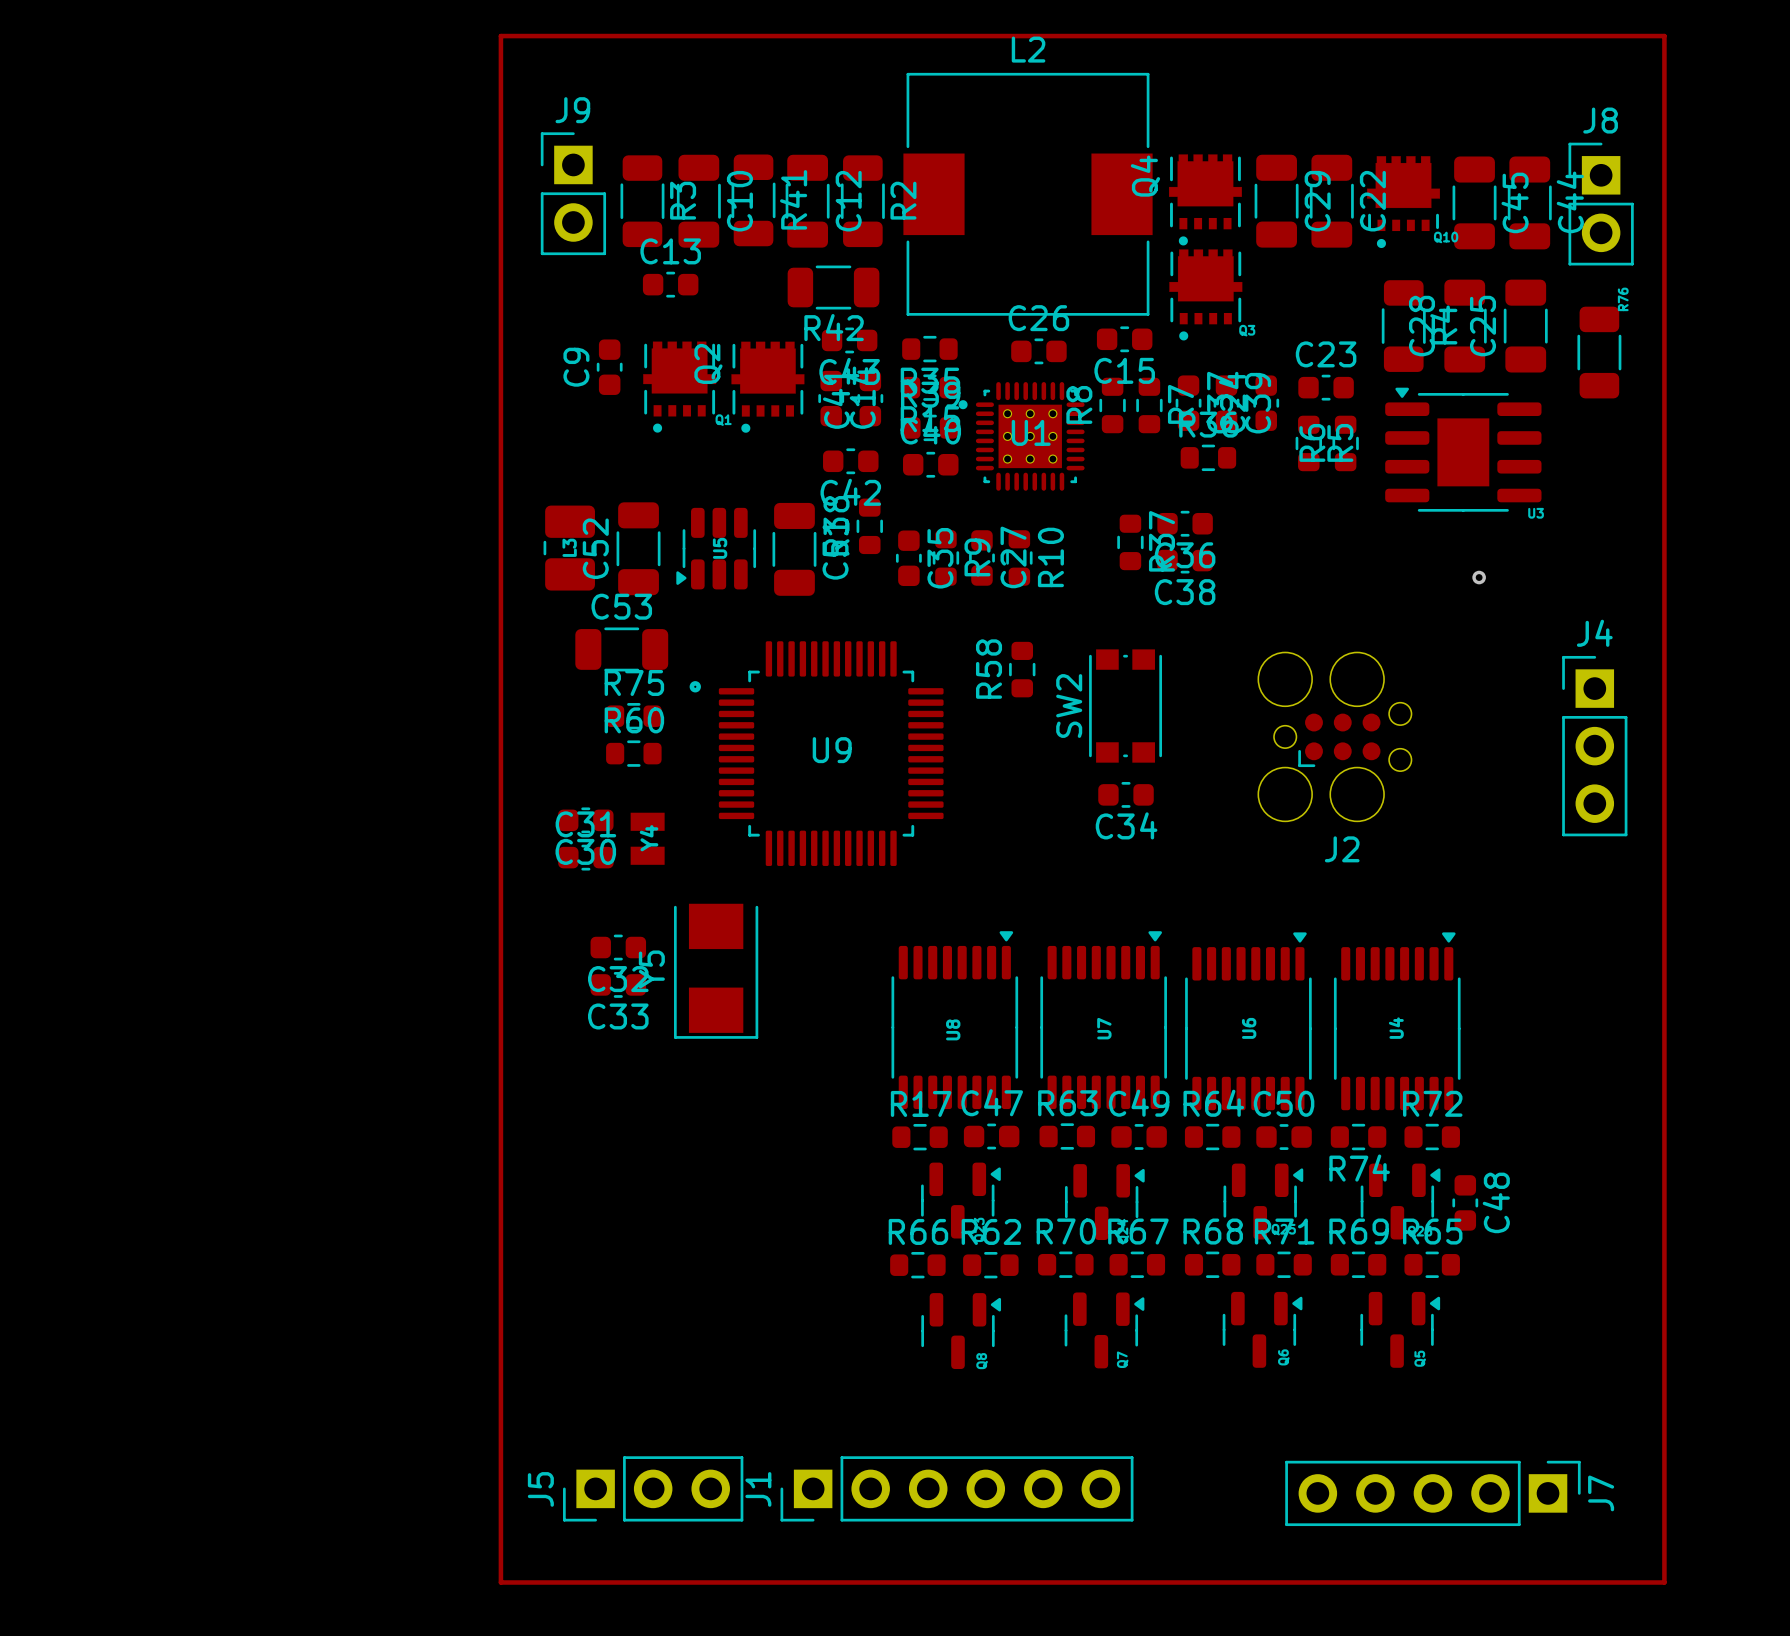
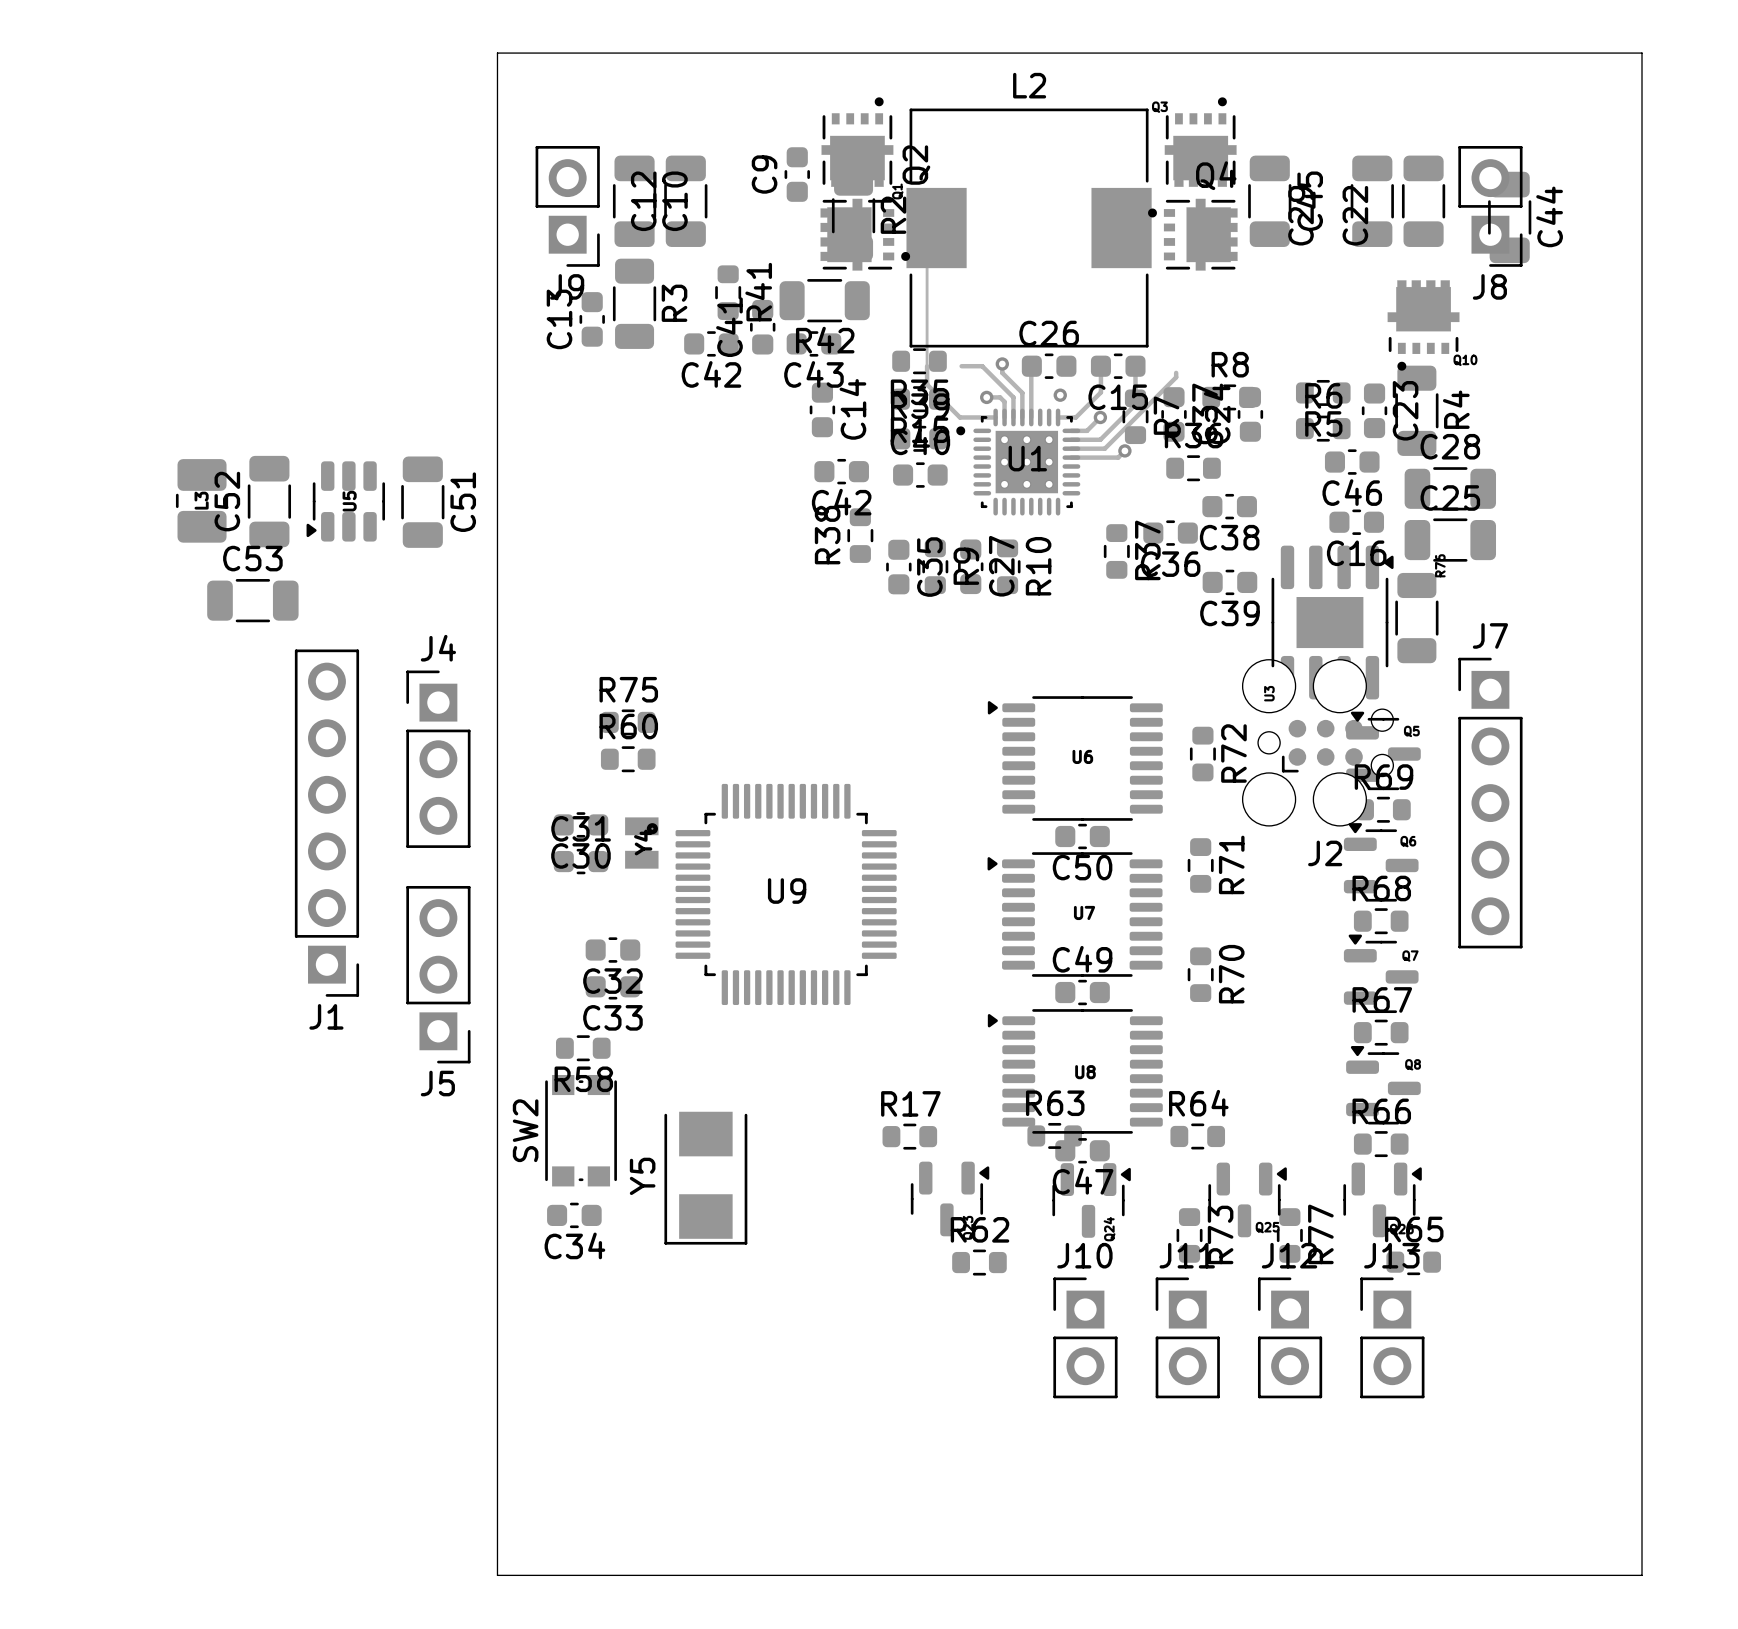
board edge: none -> (497, 53) (1642, 53) (1642, 1575) (497, 1575) (497, 53)
track: (500, 36) (1664, 36) (1664, 1582) (500, 1582) (500, 36) -> none
R41 footprint: [731, 154, 776, 247] -> [715, 265, 742, 320]
J9 rotation: 0° (573, 193) -> 180° (567, 206)
L2 position: (1028, 194) -> (1029, 228)
Q4 rotation: 0° (1205, 199) -> 90° clockwise (1192, 234)
R3 position: (642, 201) -> (634, 303)
C10 position: (698, 201) -> (634, 201)
C12 position: (807, 201) -> (685, 201)
C12 name position: C12 (848, 201) -> C12 (643, 201)
C29 position: (1276, 201) -> (1372, 201)
C22 position: (1331, 201) -> (1423, 201)
Q10 position: (1403, 202) -> (1423, 325)
C45 position: (1474, 202) -> (1269, 201)
J8 rotation: 0° (1601, 204) -> 180° (1490, 206)
J8 position: (1601, 204) -> (1490, 206)
track: none -> (936, 228) (927, 237) (926, 384) (959, 417) (995, 417)
C13 name position: C13 (670, 251) -> C13 (559, 319)
C13 rotation: 0° (670, 284) -> 90° clockwise (592, 319)
C13 position: (670, 284) -> (592, 319)
Q3 rotation: 0° (1205, 294) -> 180° (1200, 142)
Q3 position: (1205, 294) -> (1200, 142)
R4 position: (1403, 326) -> (1416, 410)
C28 rotation: 0° (1464, 326) -> 90° clockwise (1450, 488)
C28 position: (1464, 326) -> (1450, 488)
C25 rotation: 0° (1525, 326) -> 90° clockwise (1450, 540)
C25 position: (1525, 326) -> (1450, 540)
C42: none -> (711, 343)
C15 position: (1124, 339) -> (1118, 366)
C43 position: (849, 340) -> (813, 343)
track: none -> (1002, 363) (1002, 372) (1022, 392) (1022, 417)
via: none -> (1002, 363)
C26 position: (1038, 351) -> (1049, 366)
R76 position: (1599, 352) -> (1416, 618)
track: none -> (961, 366) (982, 366) (1013, 397) (1013, 417)
track: none -> (1031, 366) (1031, 417)
track: none -> (1100, 366) (1100, 392) (1075, 417) (1058, 417)
track: none -> (1135, 366) (1135, 404) (1100, 439) (1071, 439)
track: none -> (1176, 372) (1176, 377) (1104, 448) (1071, 448)
C9 position: (609, 367) -> (797, 174)
via: none -> (1060, 395)
track: none -> (986, 397) (1000, 397) (1004, 401) (1004, 417)
via: none -> (986, 397)
Q1 rotation: 0° (679, 387) -> 90° counterclockwise (865, 234)
Q1 position: (679, 387) -> (865, 234)
Q2 rotation: 0° (767, 387) -> 180° (857, 142)
Q2 position: (767, 387) -> (857, 142)
C23 rotation: 0° (1326, 387) -> 90° clockwise (1374, 410)
C23 position: (1326, 387) -> (1374, 410)
C41 position: (870, 398) -> (762, 327)
C39 rotation: 0° (1226, 403) -> 90° clockwise (1229, 582)
C39 position: (1226, 403) -> (1229, 582)
R8 rotation: 0° (1112, 405) -> 90° clockwise (1229, 397)
R8 position: (1112, 405) -> (1229, 397)
track: none -> (1100, 417) (1087, 430) (1071, 430)
via: none -> (1100, 417)
U1 position: (1021, 436) -> (1018, 462)
track: none -> (1124, 450) (1118, 457) (1071, 457)
via: none -> (1124, 450)
R5 rotation: 0° (1308, 443) -> 90° clockwise (1323, 392)
R5 position: (1308, 443) -> (1323, 392)
R6 rotation: 0° (1345, 443) -> 90° clockwise (1323, 428)
U3 rotation: 0° (1463, 449) -> 90° clockwise (1332, 622)
U3 position: (1463, 449) -> (1332, 622)
C46: none -> (1352, 462)
C16: none -> (1356, 522)
L3 position: (570, 548) -> (202, 500)
C52 position: (638, 548) -> (269, 501)
U5 position: (716, 548) -> (345, 501)
C51 position: (794, 549) -> (422, 502)
C38 position: (1185, 560) -> (1229, 506)
via: (1479, 577) -> none
C53 position: (621, 649) -> (252, 600)
R58 name position: R58 (989, 669) -> R58 (583, 1079)
R58 rotation: 0° (1022, 669) -> 90° clockwise (583, 1048)
R58 position: (1022, 669) -> (583, 1048)
SW2 position: (1125, 706) -> (581, 1130)
J4 position: (1594, 746) -> (438, 759)
U9 position: (816, 753) -> (771, 894)
C34 position: (1126, 794) -> (574, 1215)
Y5 position: (716, 971) -> (705, 1178)
U8 rotation: 0° (954, 1020) -> 90° counterclockwise (1075, 1071)
U8 position: (954, 1020) -> (1075, 1071)
U7 rotation: 0° (1103, 1020) -> 90° counterclockwise (1075, 914)
U7 position: (1103, 1020) -> (1075, 914)
U6 rotation: 0° (1248, 1021) -> 90° counterclockwise (1075, 758)
U6 position: (1248, 1021) -> (1075, 758)
U4: (1397, 1021) -> none
C47 name position: C47 (992, 1102) -> C47 (1083, 1181)
C50 name position: C50 (1284, 1103) -> C50 (1082, 867)
C47 position: (991, 1136) -> (1082, 1150)
C49 position: (1139, 1136) -> (1082, 992)
C50 position: (1284, 1137) -> (1082, 836)
R74: (1358, 1137) -> none
R72 rotation: 0° (1432, 1137) -> 90° clockwise (1202, 754)
R72 position: (1432, 1137) -> (1202, 754)
C48: (1465, 1202) -> none
R73: none -> (1189, 1235)
R77: none -> (1289, 1235)
R70 rotation: 0° (1065, 1264) -> 90° clockwise (1200, 974)
R70 position: (1065, 1264) -> (1200, 974)
R67 position: (1137, 1264) -> (1381, 1032)
R68 position: (1212, 1264) -> (1381, 921)
R71 rotation: 0° (1284, 1264) -> 90° clockwise (1200, 865)
R71 position: (1284, 1264) -> (1200, 865)
R69 position: (1358, 1264) -> (1383, 809)
R66 position: (917, 1265) -> (1381, 1144)
Q6 rotation: 0° (1262, 1329) -> 90° counterclockwise (1381, 862)
Q6 position: (1262, 1329) -> (1381, 862)
Q5 rotation: 0° (1400, 1329) -> 90° counterclockwise (1383, 750)
Q5 position: (1400, 1329) -> (1383, 750)
Q7 rotation: 0° (1104, 1330) -> 90° counterclockwise (1381, 973)
Q7 position: (1104, 1330) -> (1381, 973)
Q8 rotation: 0° (961, 1331) -> 90° counterclockwise (1383, 1085)
Q8 position: (961, 1331) -> (1383, 1085)
J10: none -> (1085, 1337)
J11: none -> (1187, 1337)
J12: none -> (1290, 1337)
J13: none -> (1392, 1337)
J5 rotation: 0° (653, 1488) -> 90° counterclockwise (438, 974)
J5 position: (653, 1488) -> (438, 974)
J1 rotation: 0° (957, 1488) -> 90° counterclockwise (326, 823)
J1 position: (957, 1488) -> (326, 823)
J7 rotation: 0° (1432, 1493) -> 90° counterclockwise (1490, 803)
J7 position: (1432, 1493) -> (1490, 803)

